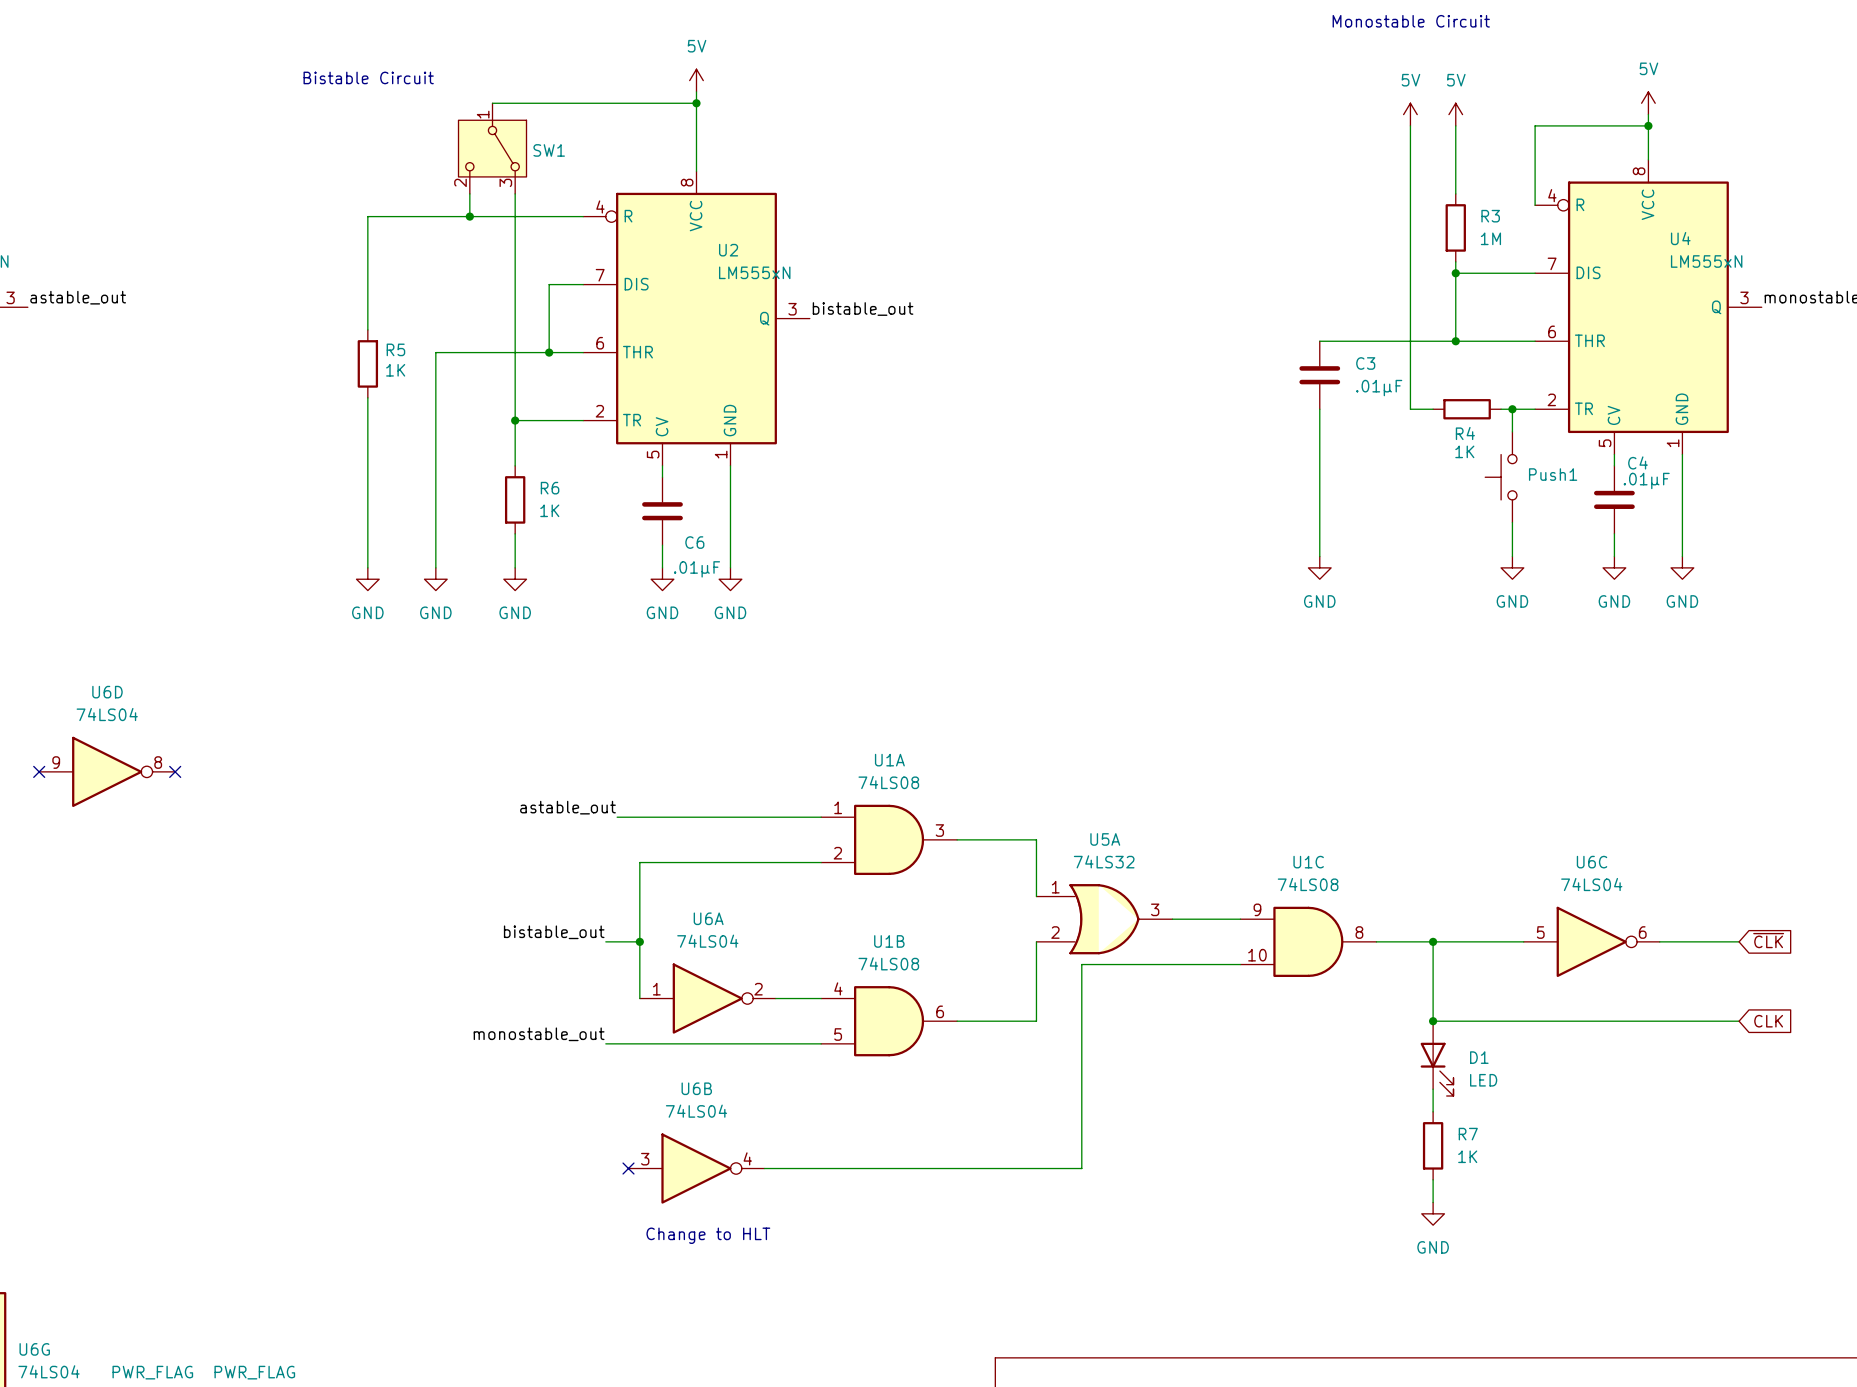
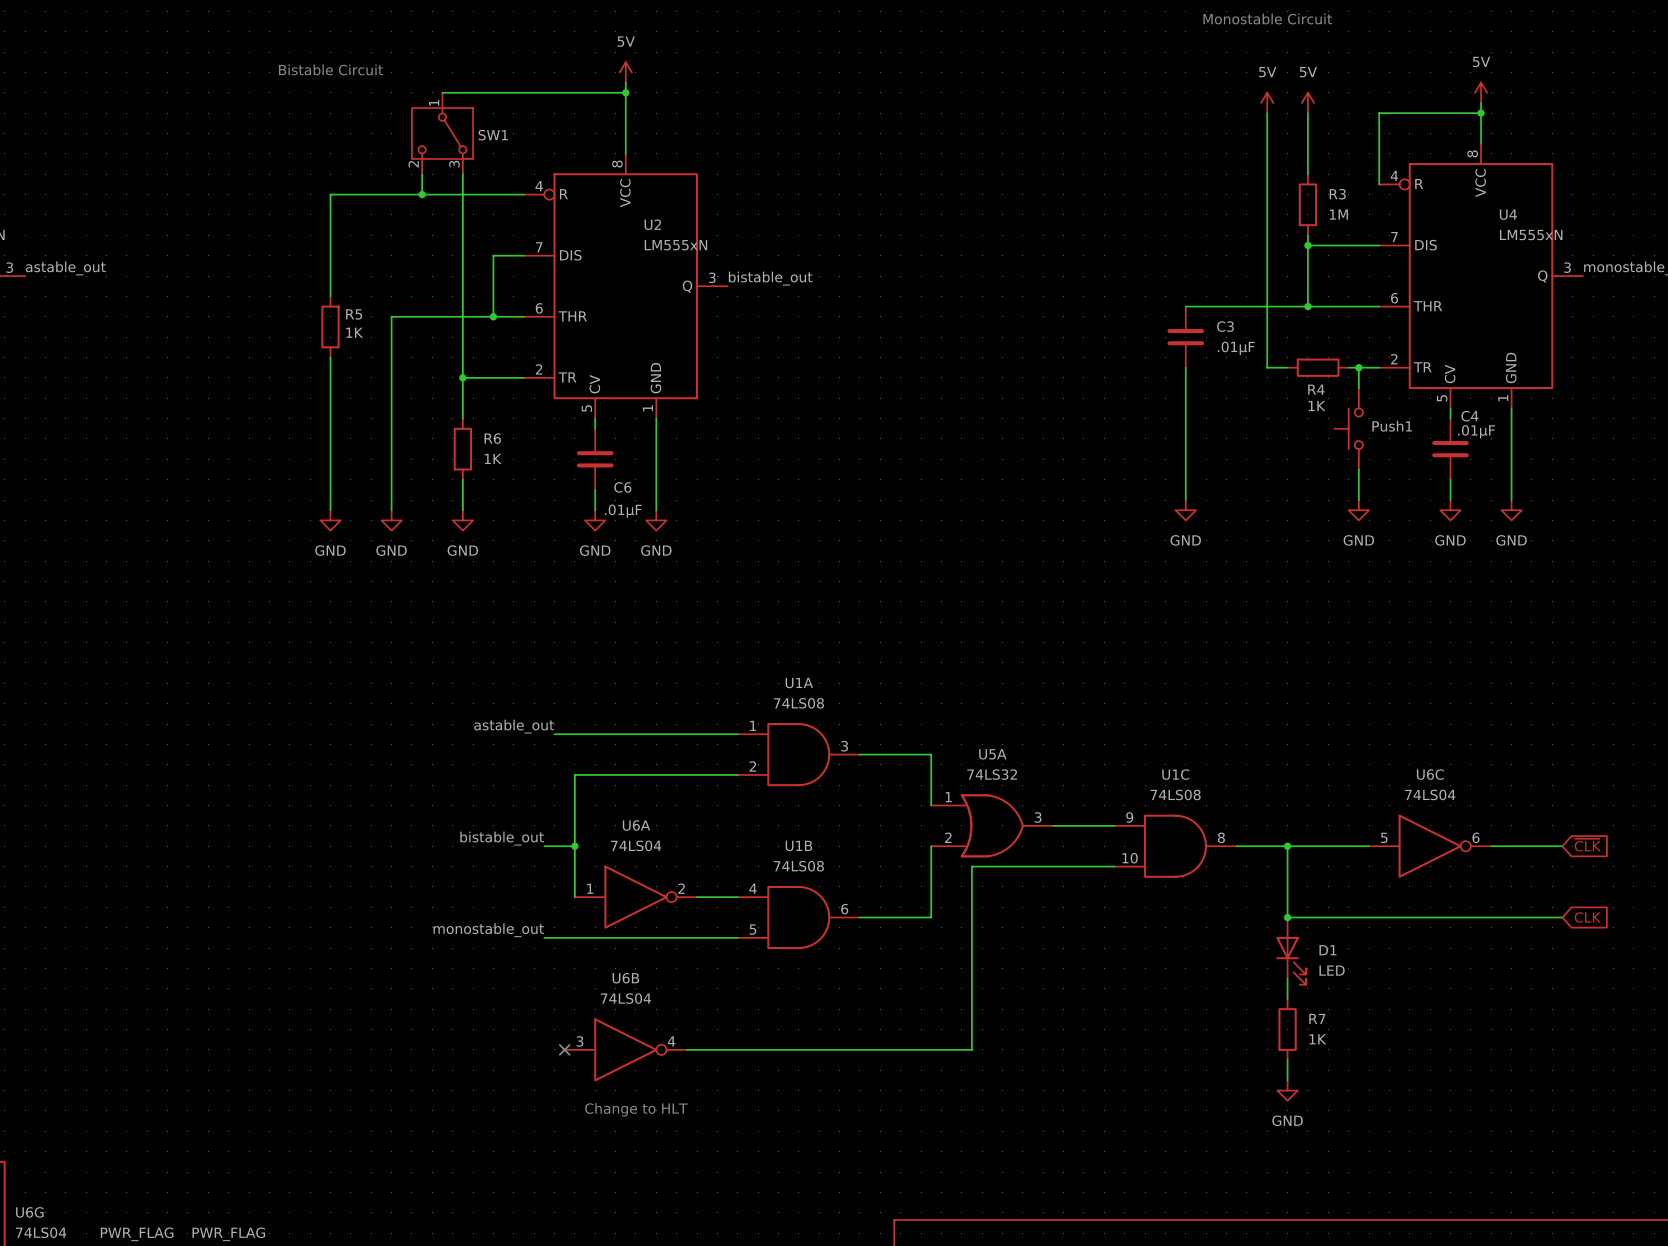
no-connect mark: (39, 771) -> none
U6D: 74LS04 (107, 771) -> none
no-connect mark: (175, 771) -> none

